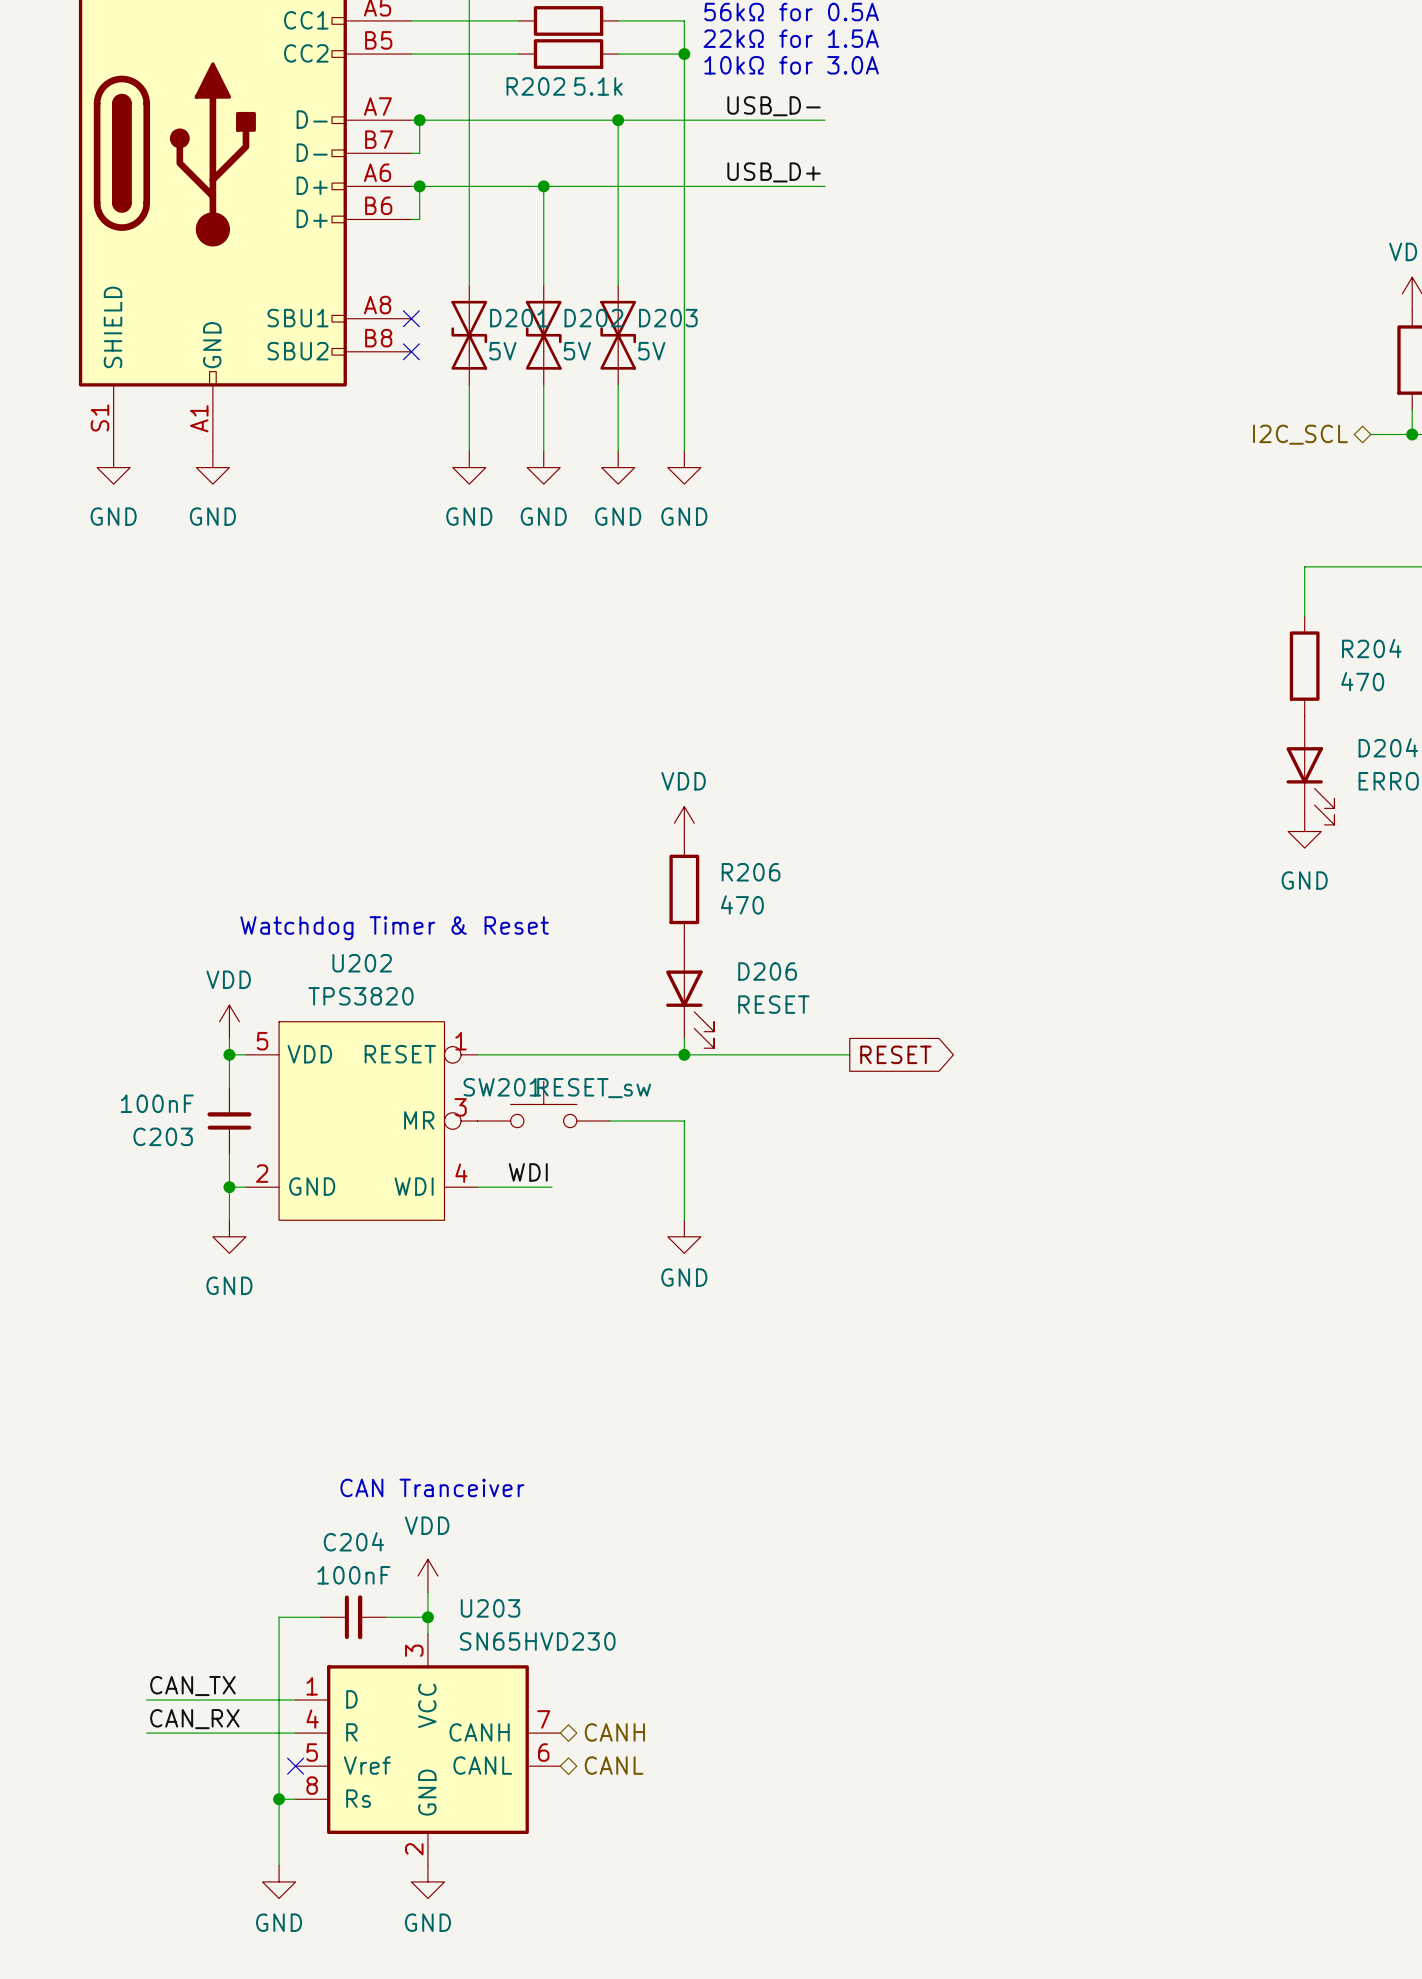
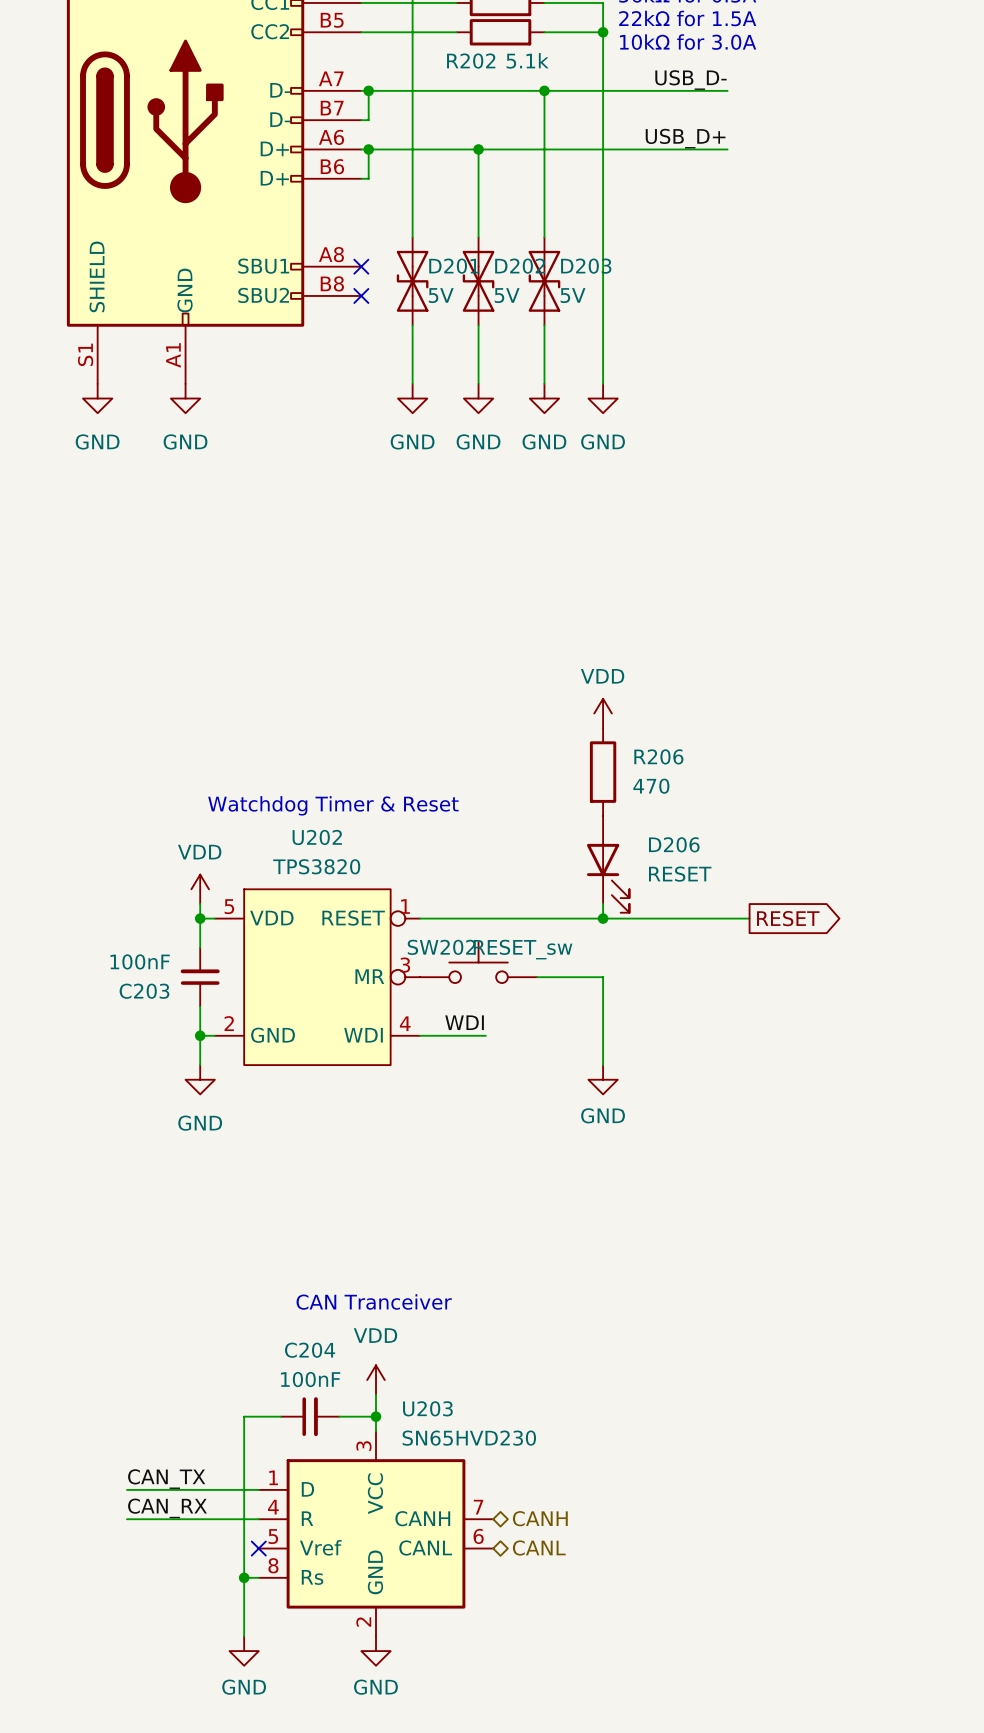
SW201 name: SW201 (502, 1087) -> SW202 (441, 947)

